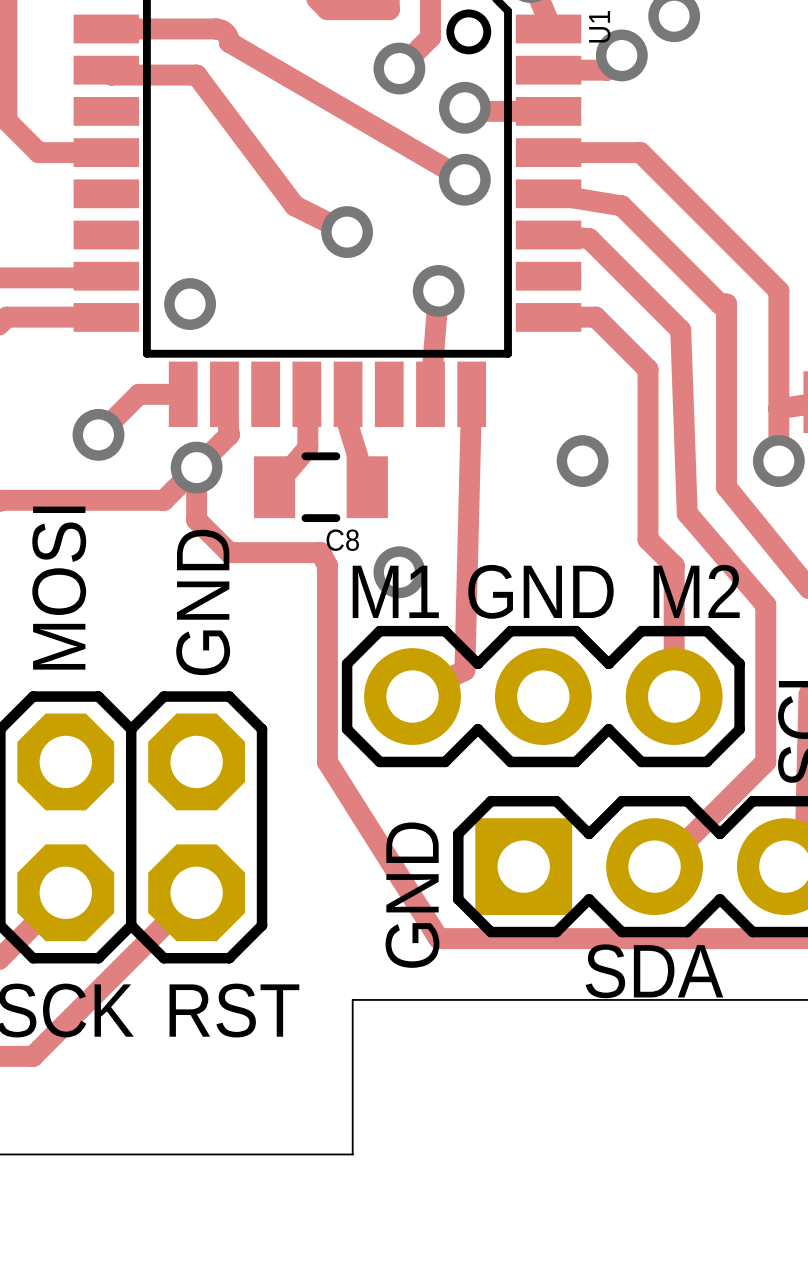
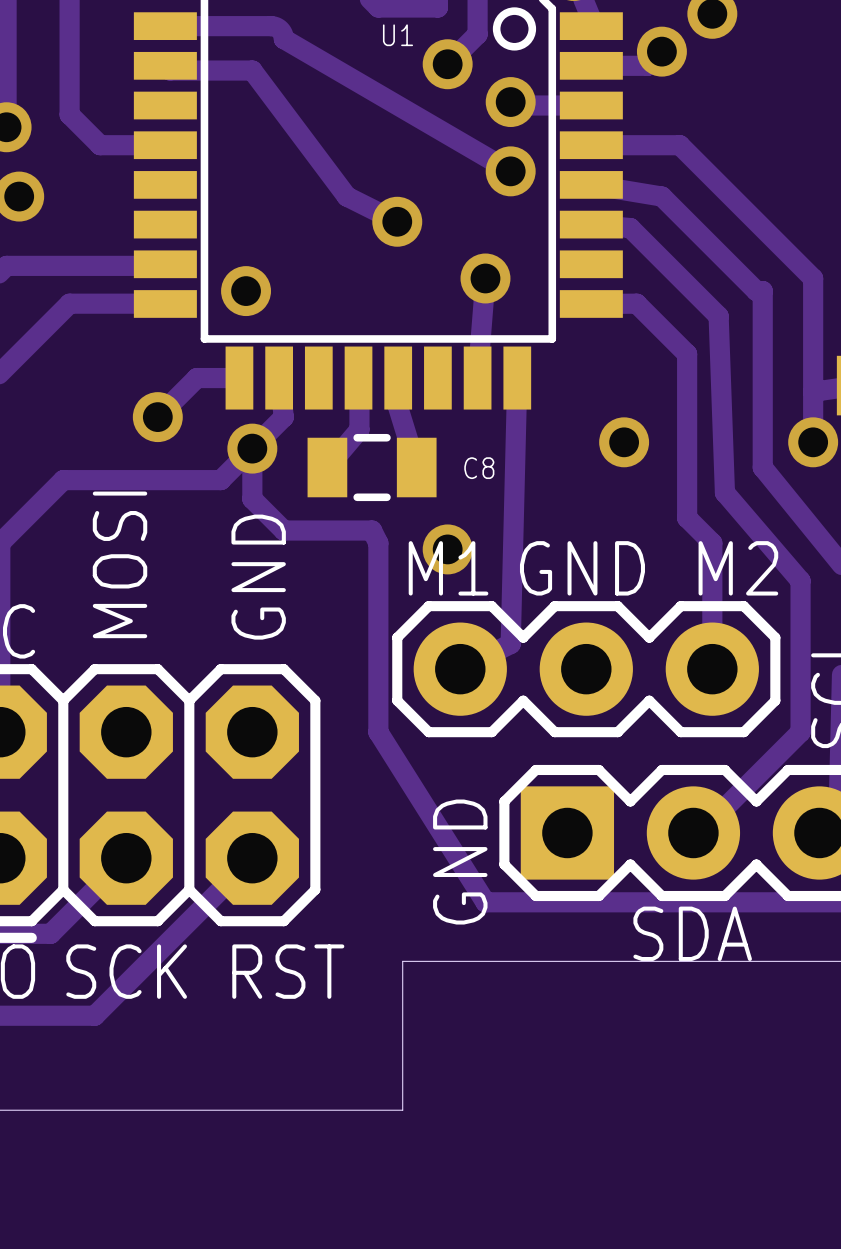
U1 name rotation: 0° (599, 26) -> 90° clockwise (398, 35)
U1 name position: U1 (599, 26) -> U1 (398, 35)
C8 name position: C8 (342, 540) -> C8 (479, 468)

